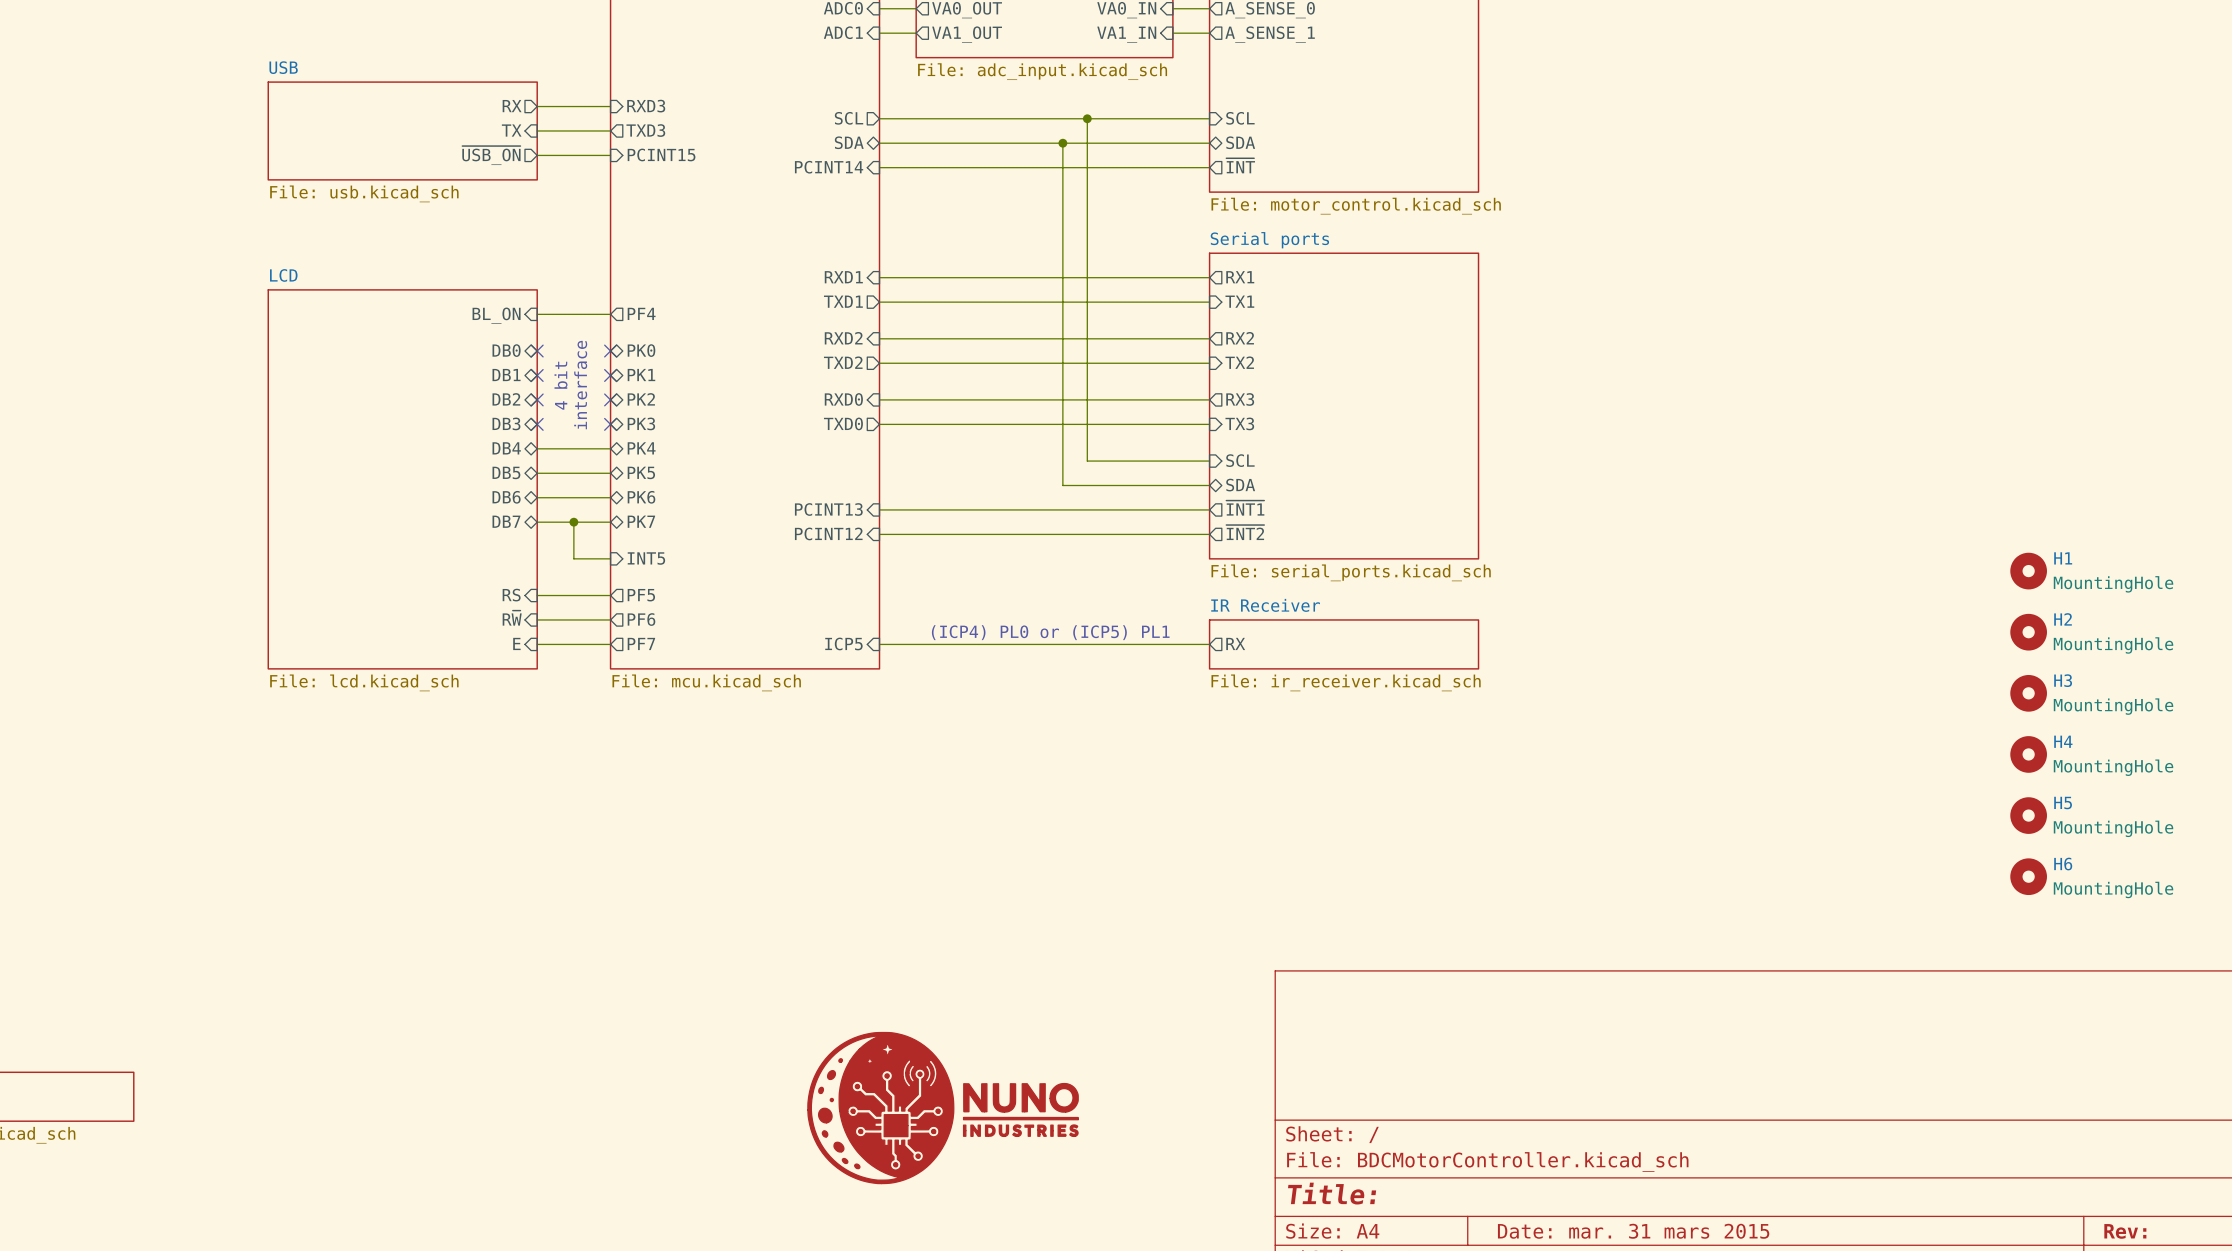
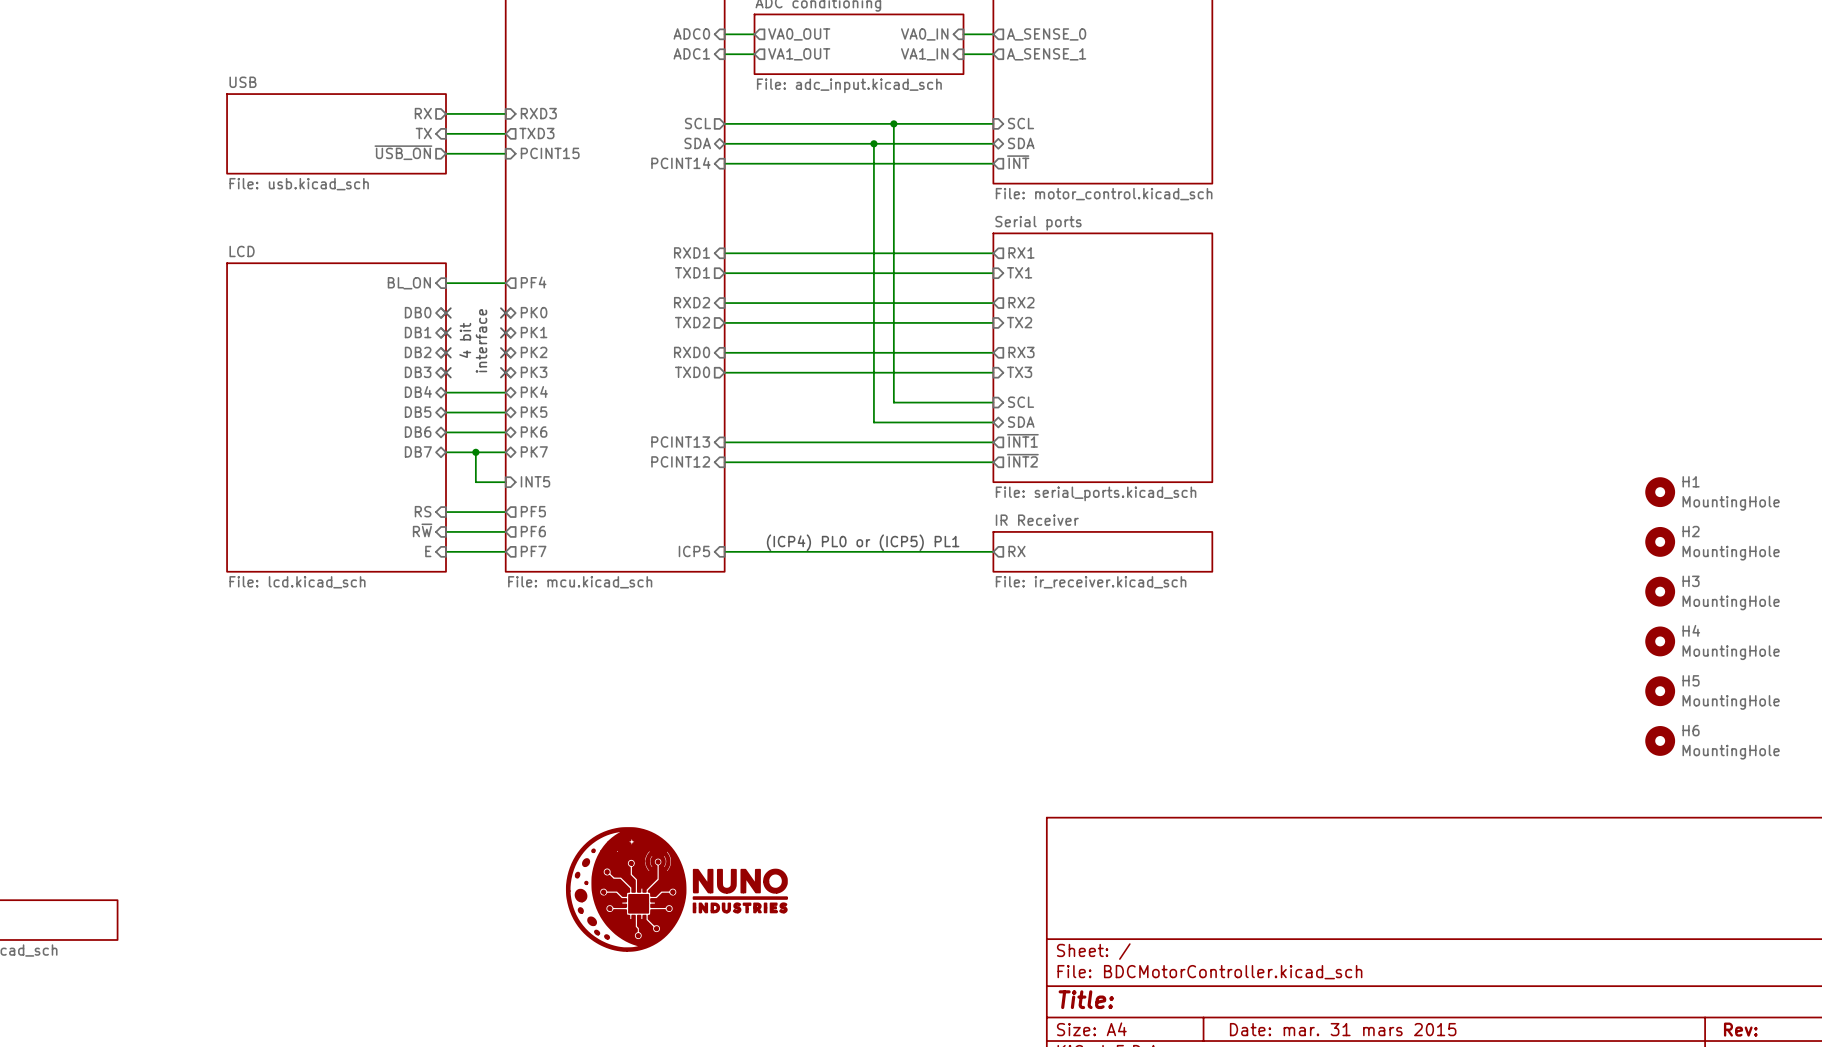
power symbol: none -> (676, 889)
part: (943, 1108) -> none

